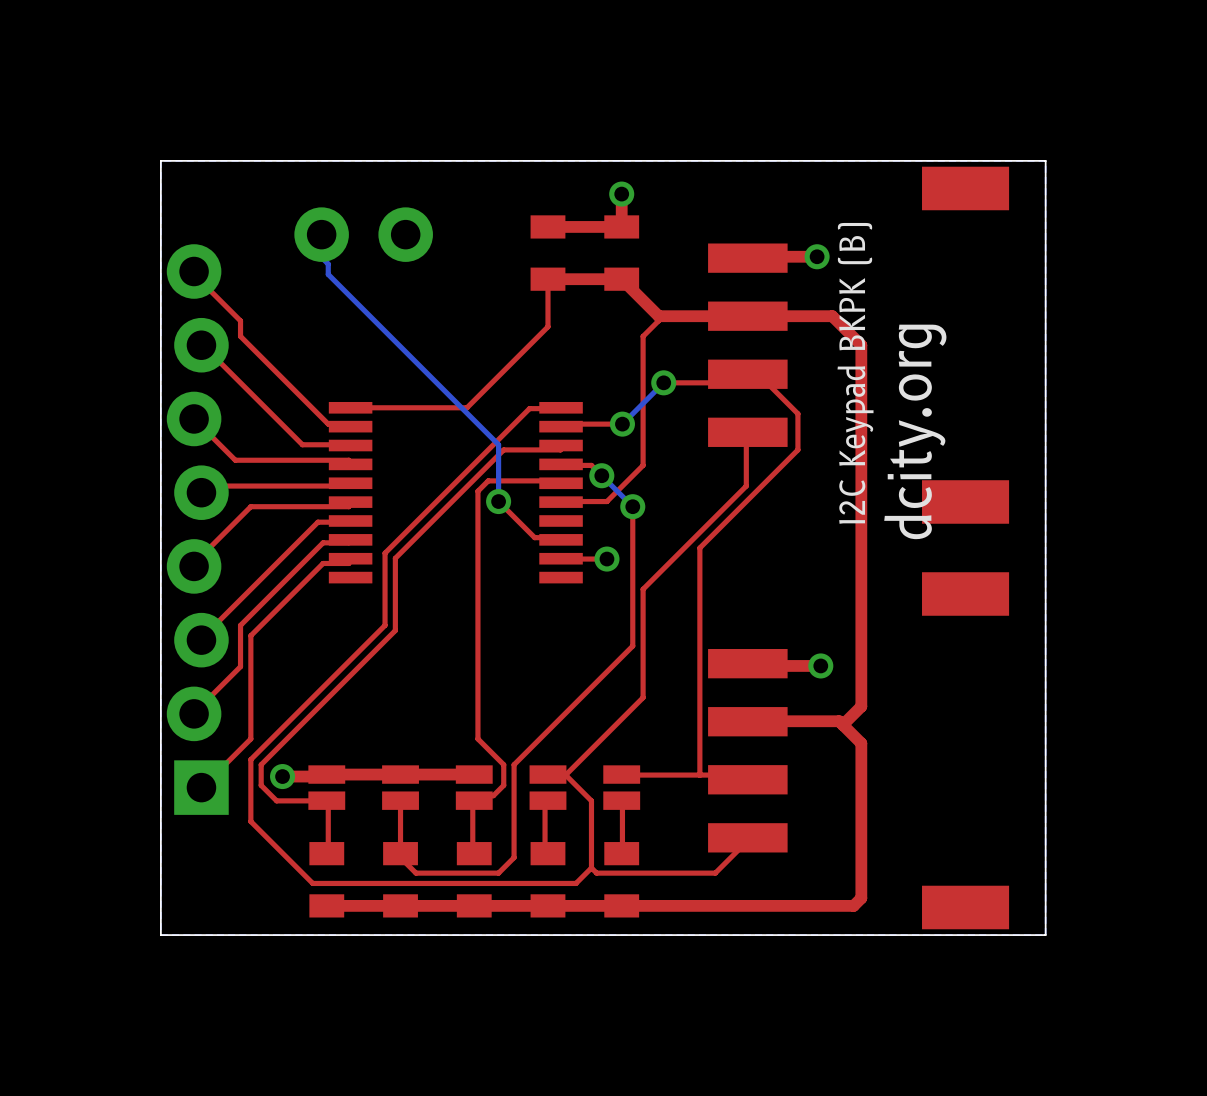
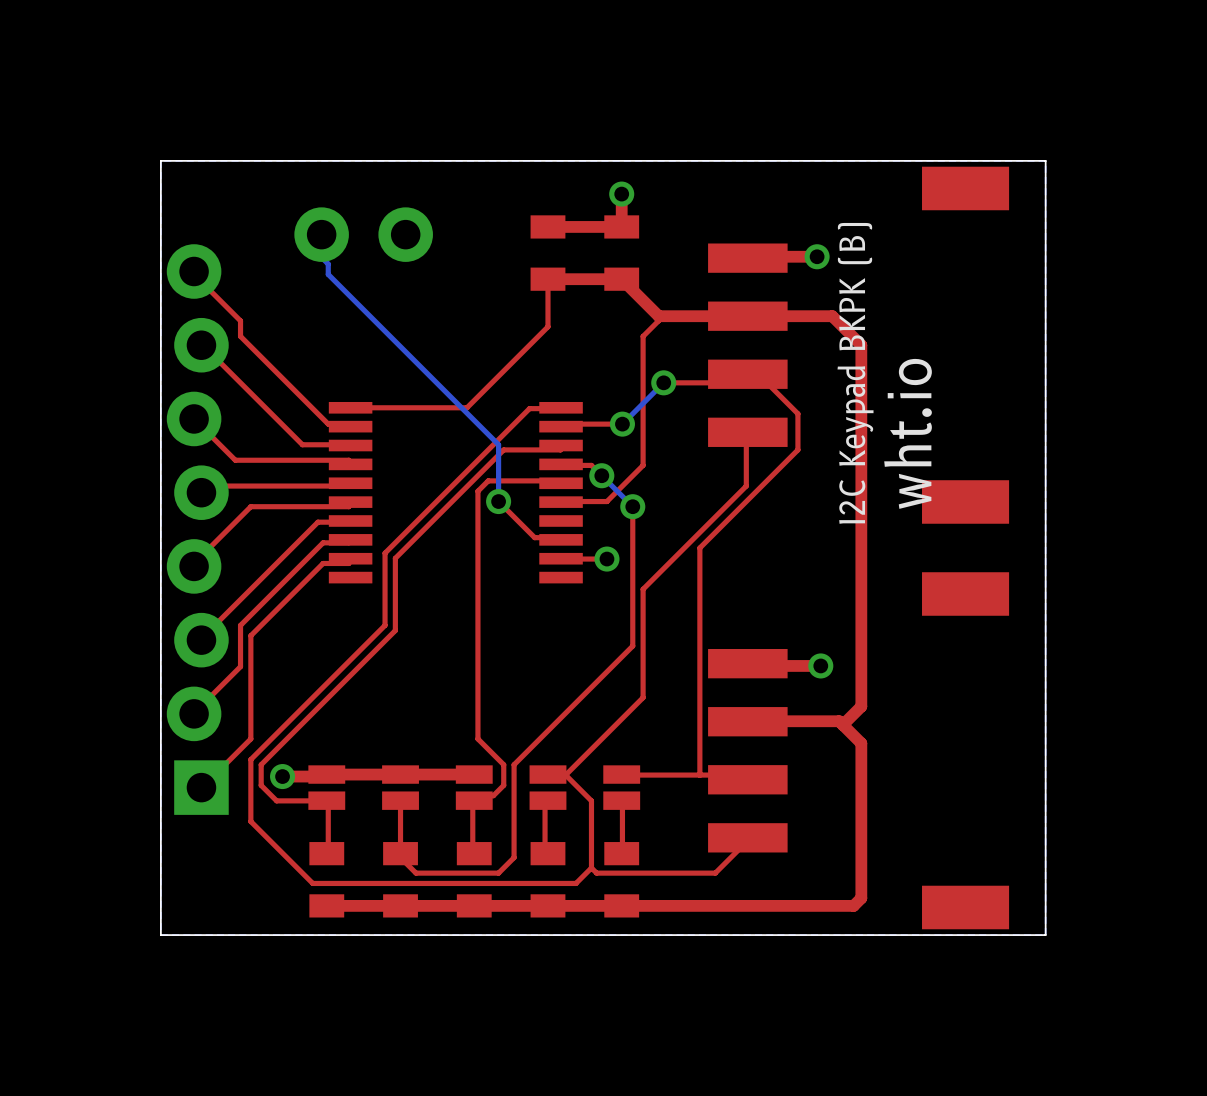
text: dcity.org (915, 431) -> none
text: none -> wht.io (908, 433)

